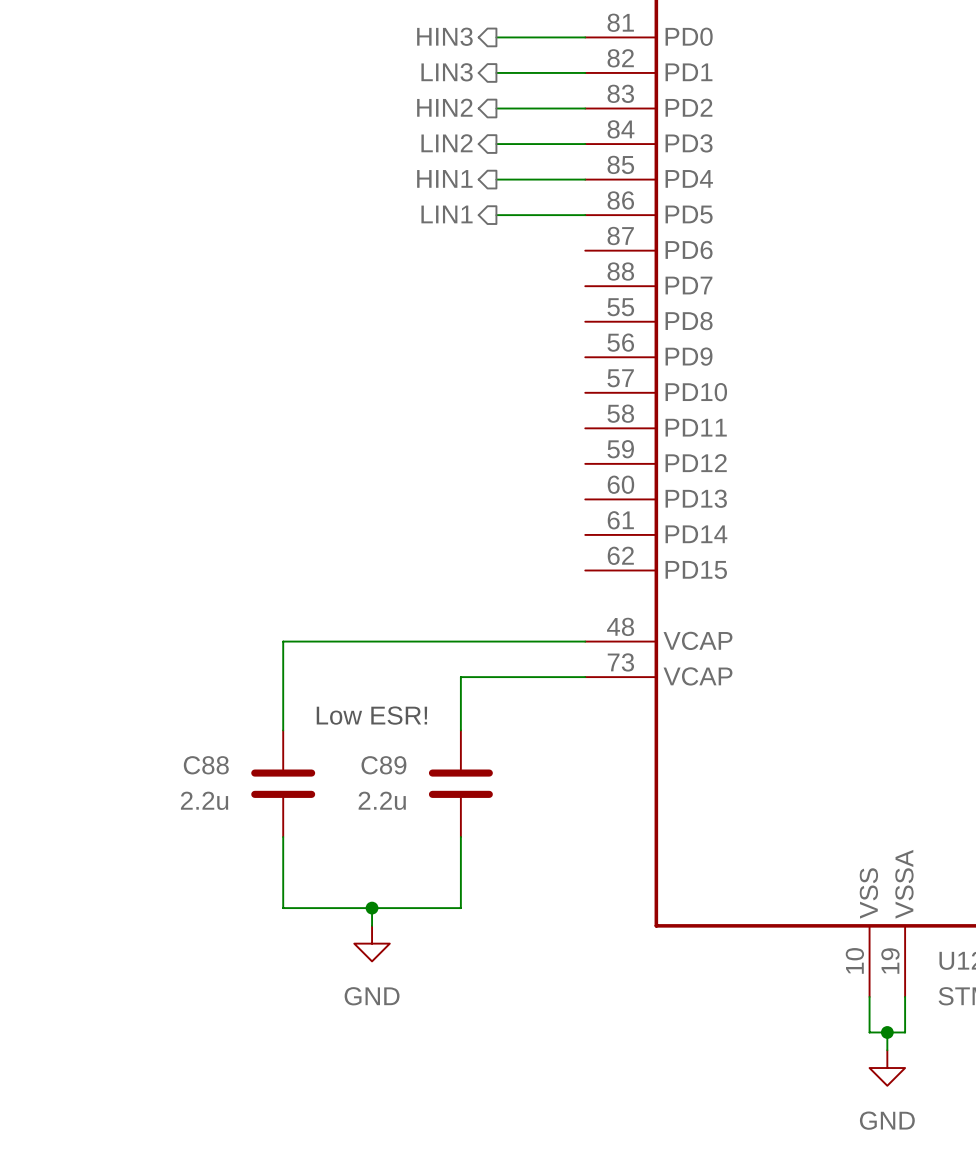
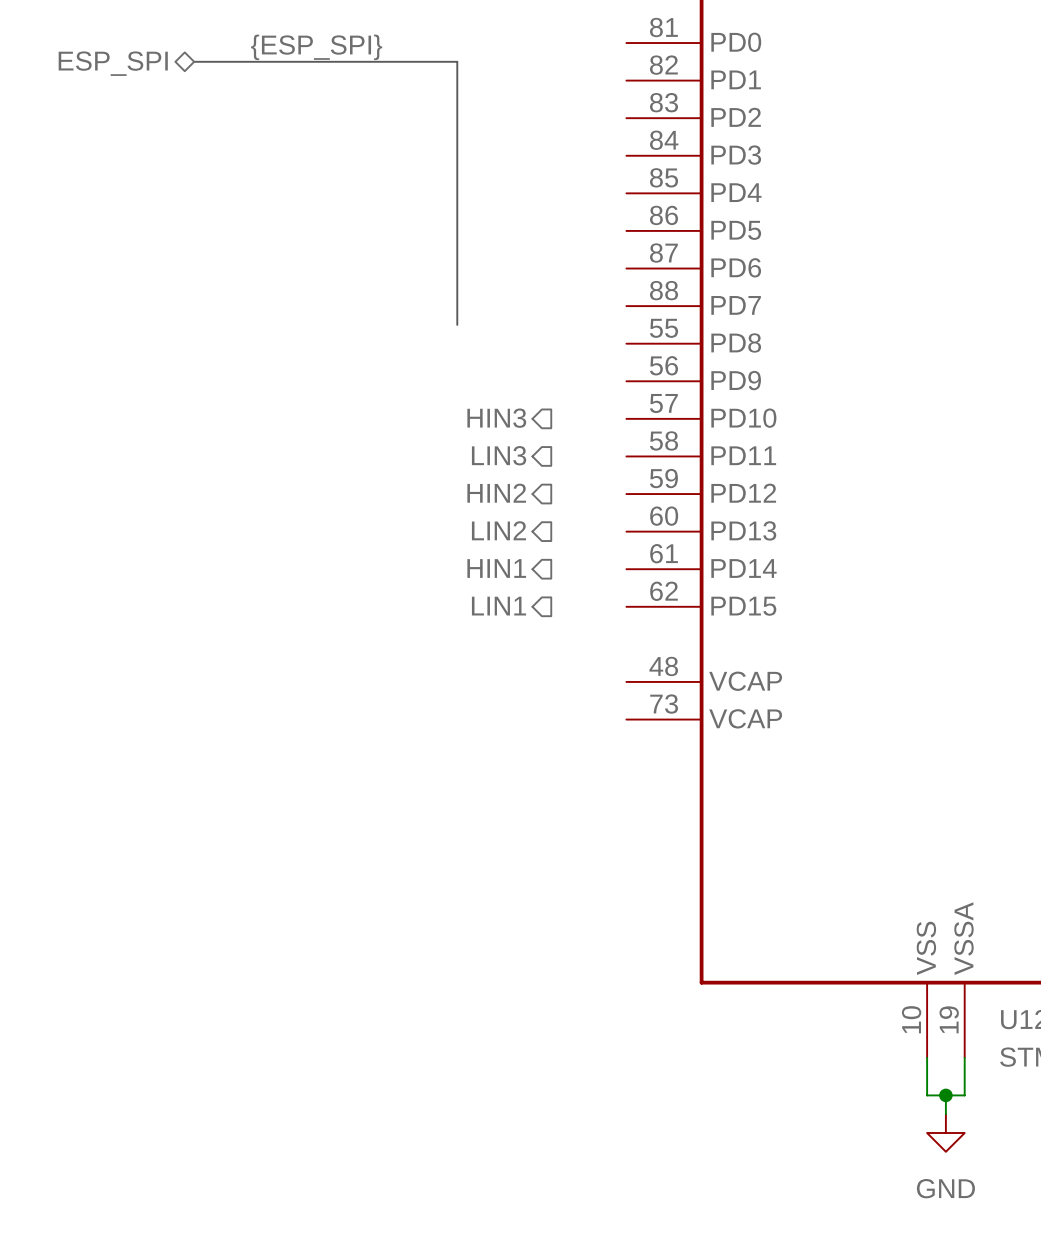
hierarchical label: HIN3 (444, 36) -> none
wire: (496, 37) (585, 37) -> none
label: none -> {ESP_SPI} (316, 47)
bus: none -> (194, 61) (457, 61) (457, 324)
hierarchical label: none -> ESP_SPI (113, 63)
hierarchical label: LIN3 (447, 72) -> none
wire: (496, 72) (585, 72) -> none
hierarchical label: HIN2 (444, 107) -> none
wire: (496, 108) (585, 108) -> none
hierarchical label: LIN2 (446, 143) -> none
wire: (496, 144) (585, 144) -> none
hierarchical label: HIN1 (444, 178) -> none
wire: (496, 179) (585, 179) -> none
hierarchical label: LIN1 (447, 214) -> none
wire: (496, 215) (585, 215) -> none
hierarchical label: none -> HIN3 (496, 418)
hierarchical label: none -> LIN3 (499, 455)
hierarchical label: none -> HIN2 (496, 493)
hierarchical label: none -> LIN2 (498, 530)
hierarchical label: none -> HIN1 (496, 568)
hierarchical label: none -> LIN1 (498, 606)
wire: (585, 641) (283, 641) (283, 730) -> none
wire: (585, 677) (460, 677) (460, 730) -> none
text: Low ESR! (371, 715) -> none
C88: 2.2u (283, 783) -> none
C89: 2.2u (460, 783) -> none
wire: (283, 837) (283, 908) (460, 908) (460, 837) -> none
wire: (372, 908) (372, 925) -> none
junction: (372, 908) -> none
power symbol: GND (372, 943) -> none

